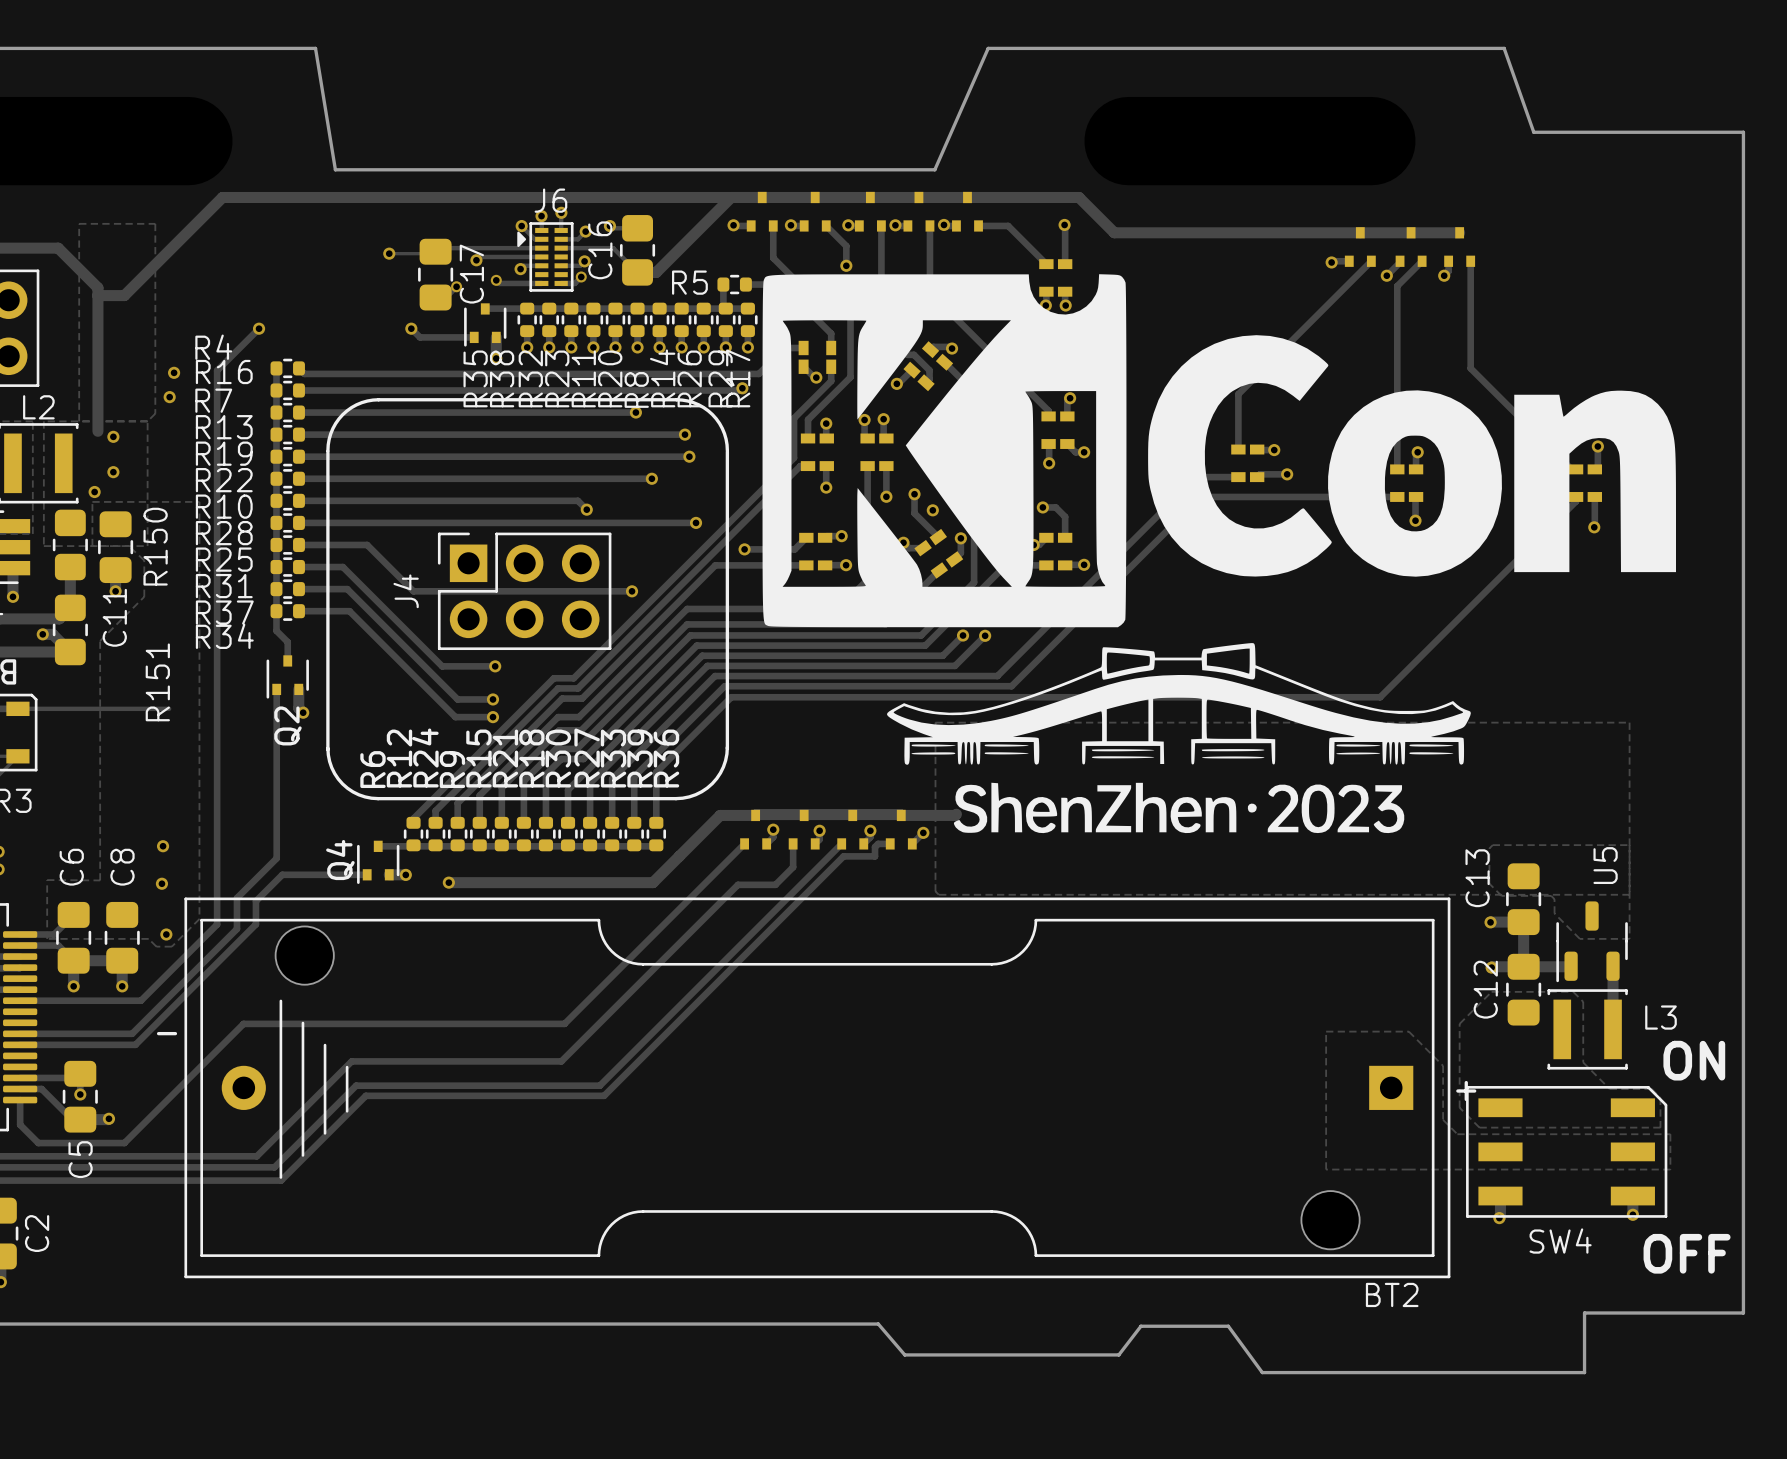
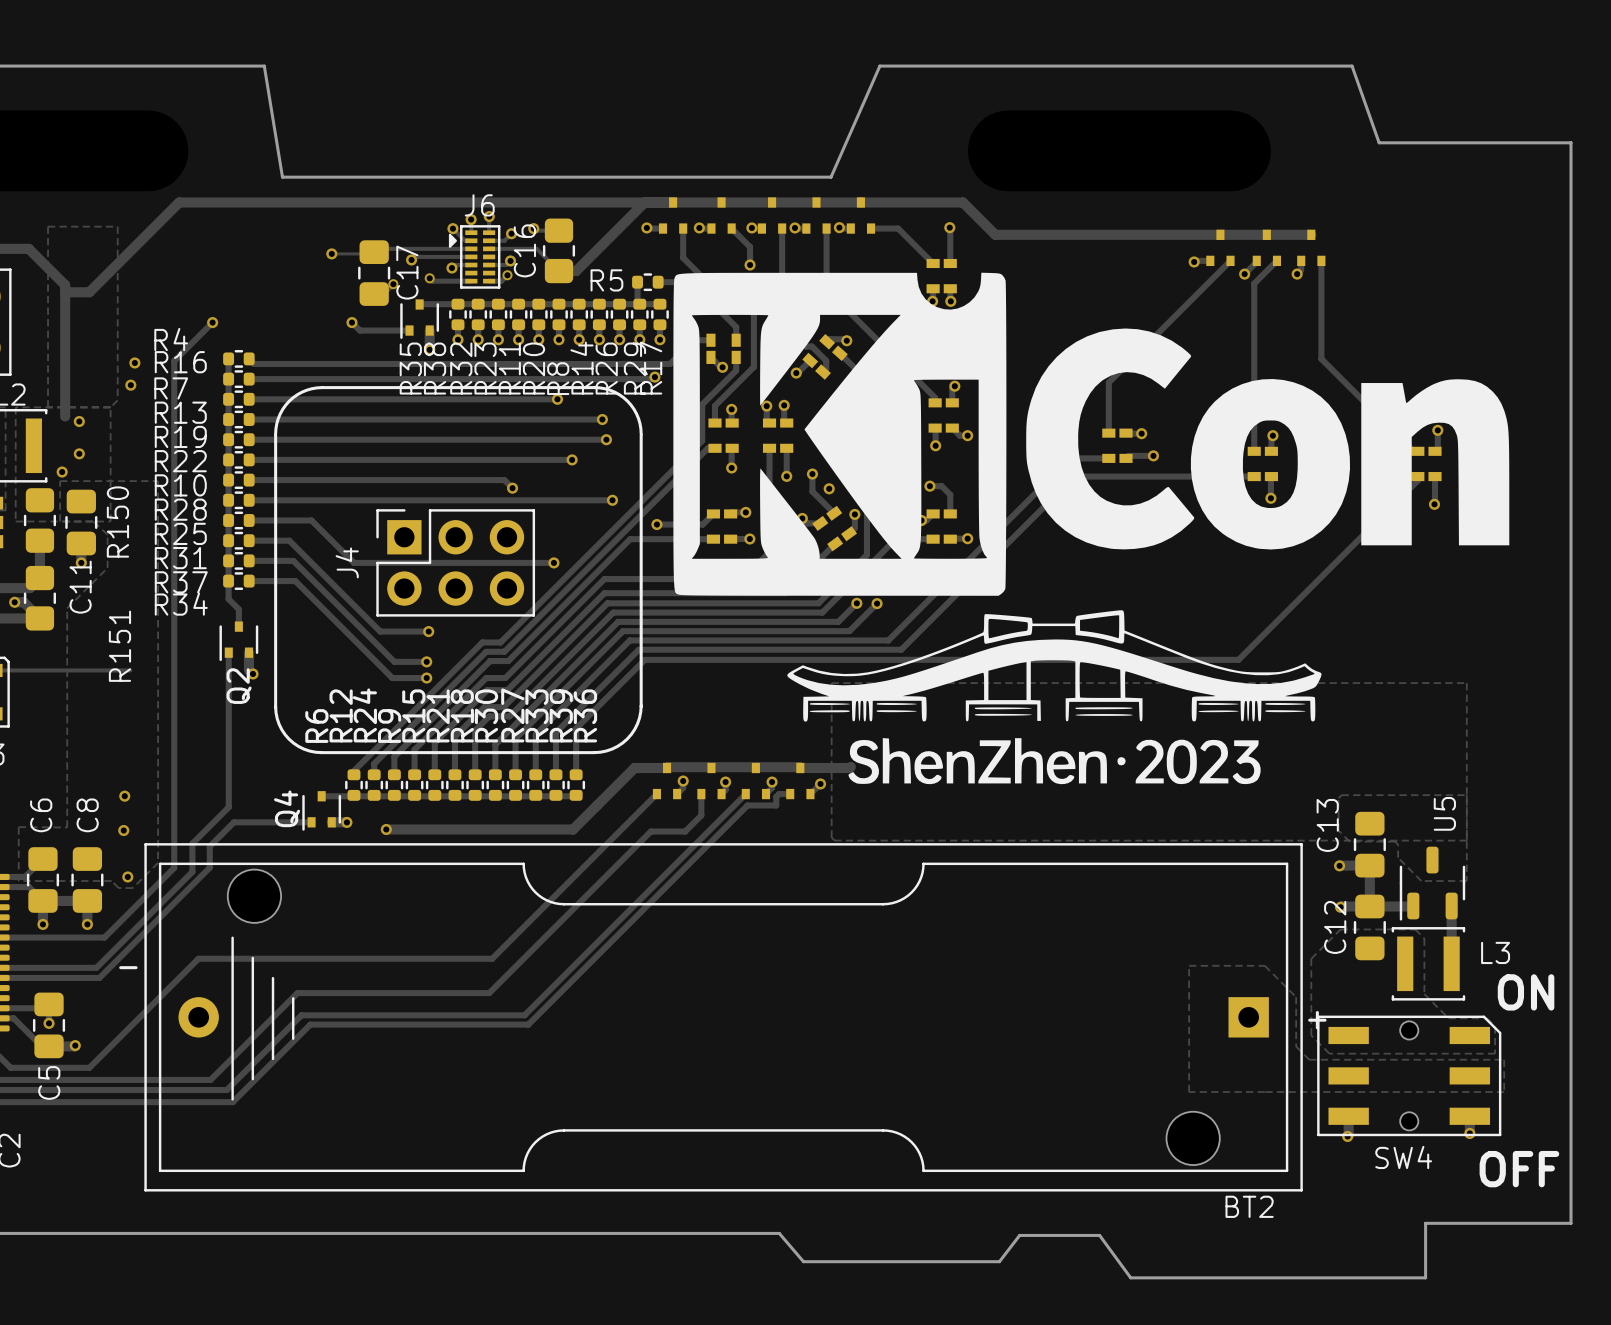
SW4 footprint: [1466, 1086, 1668, 1218] -> [1317, 1015, 1502, 1137]

